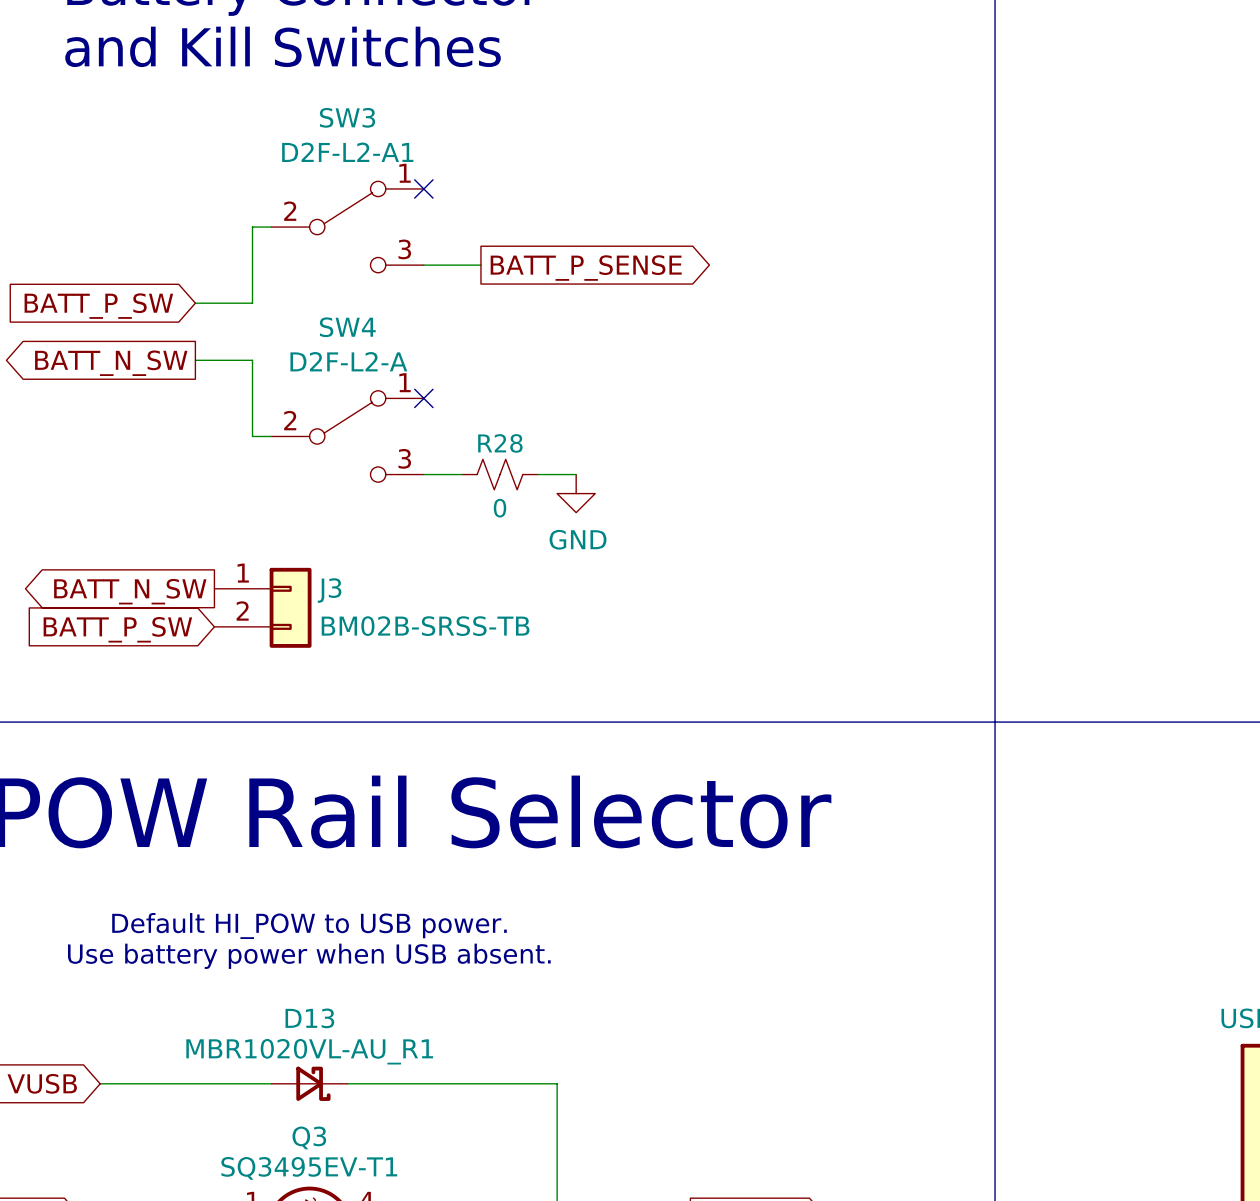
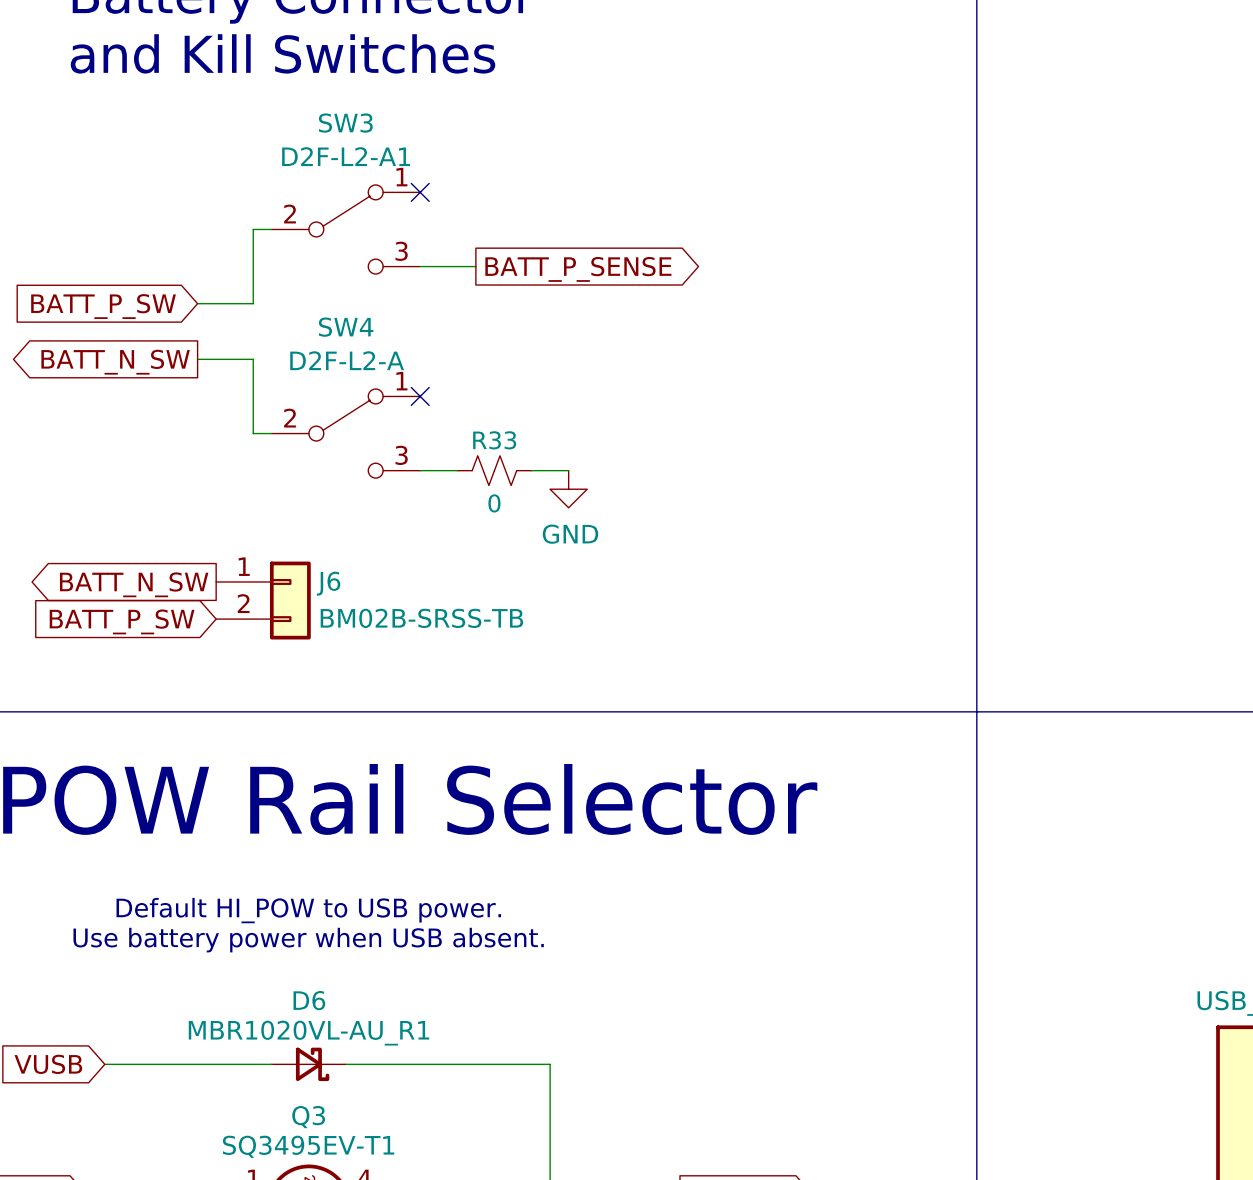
R28 name: R28 (500, 443) -> R33 (494, 440)
J3 name: J3 (329, 590) -> J6 (328, 583)
D13 name: D13 (309, 1018) -> D6 (309, 1000)

